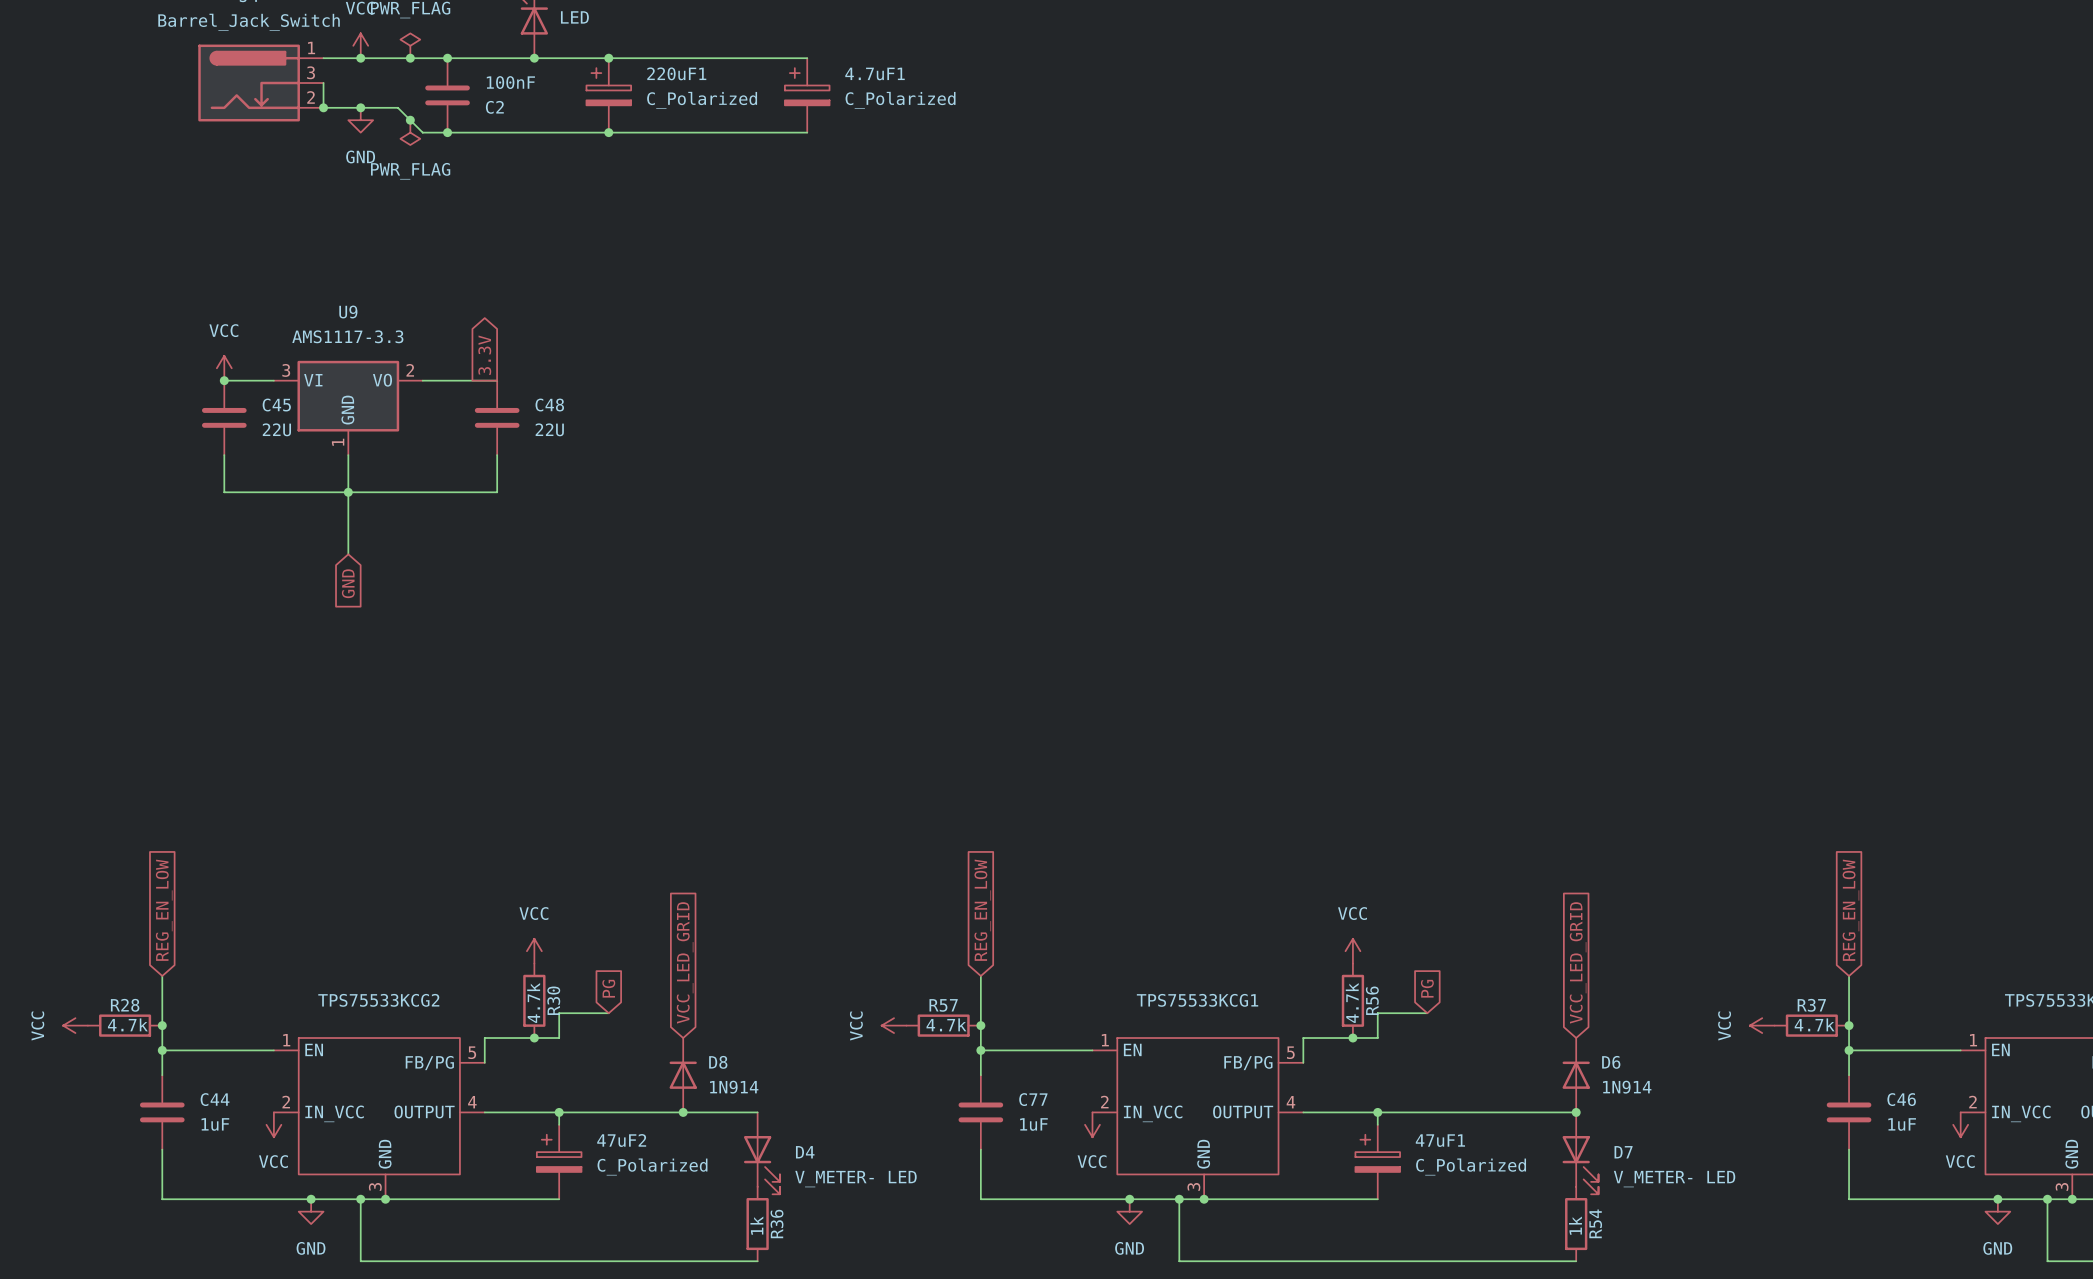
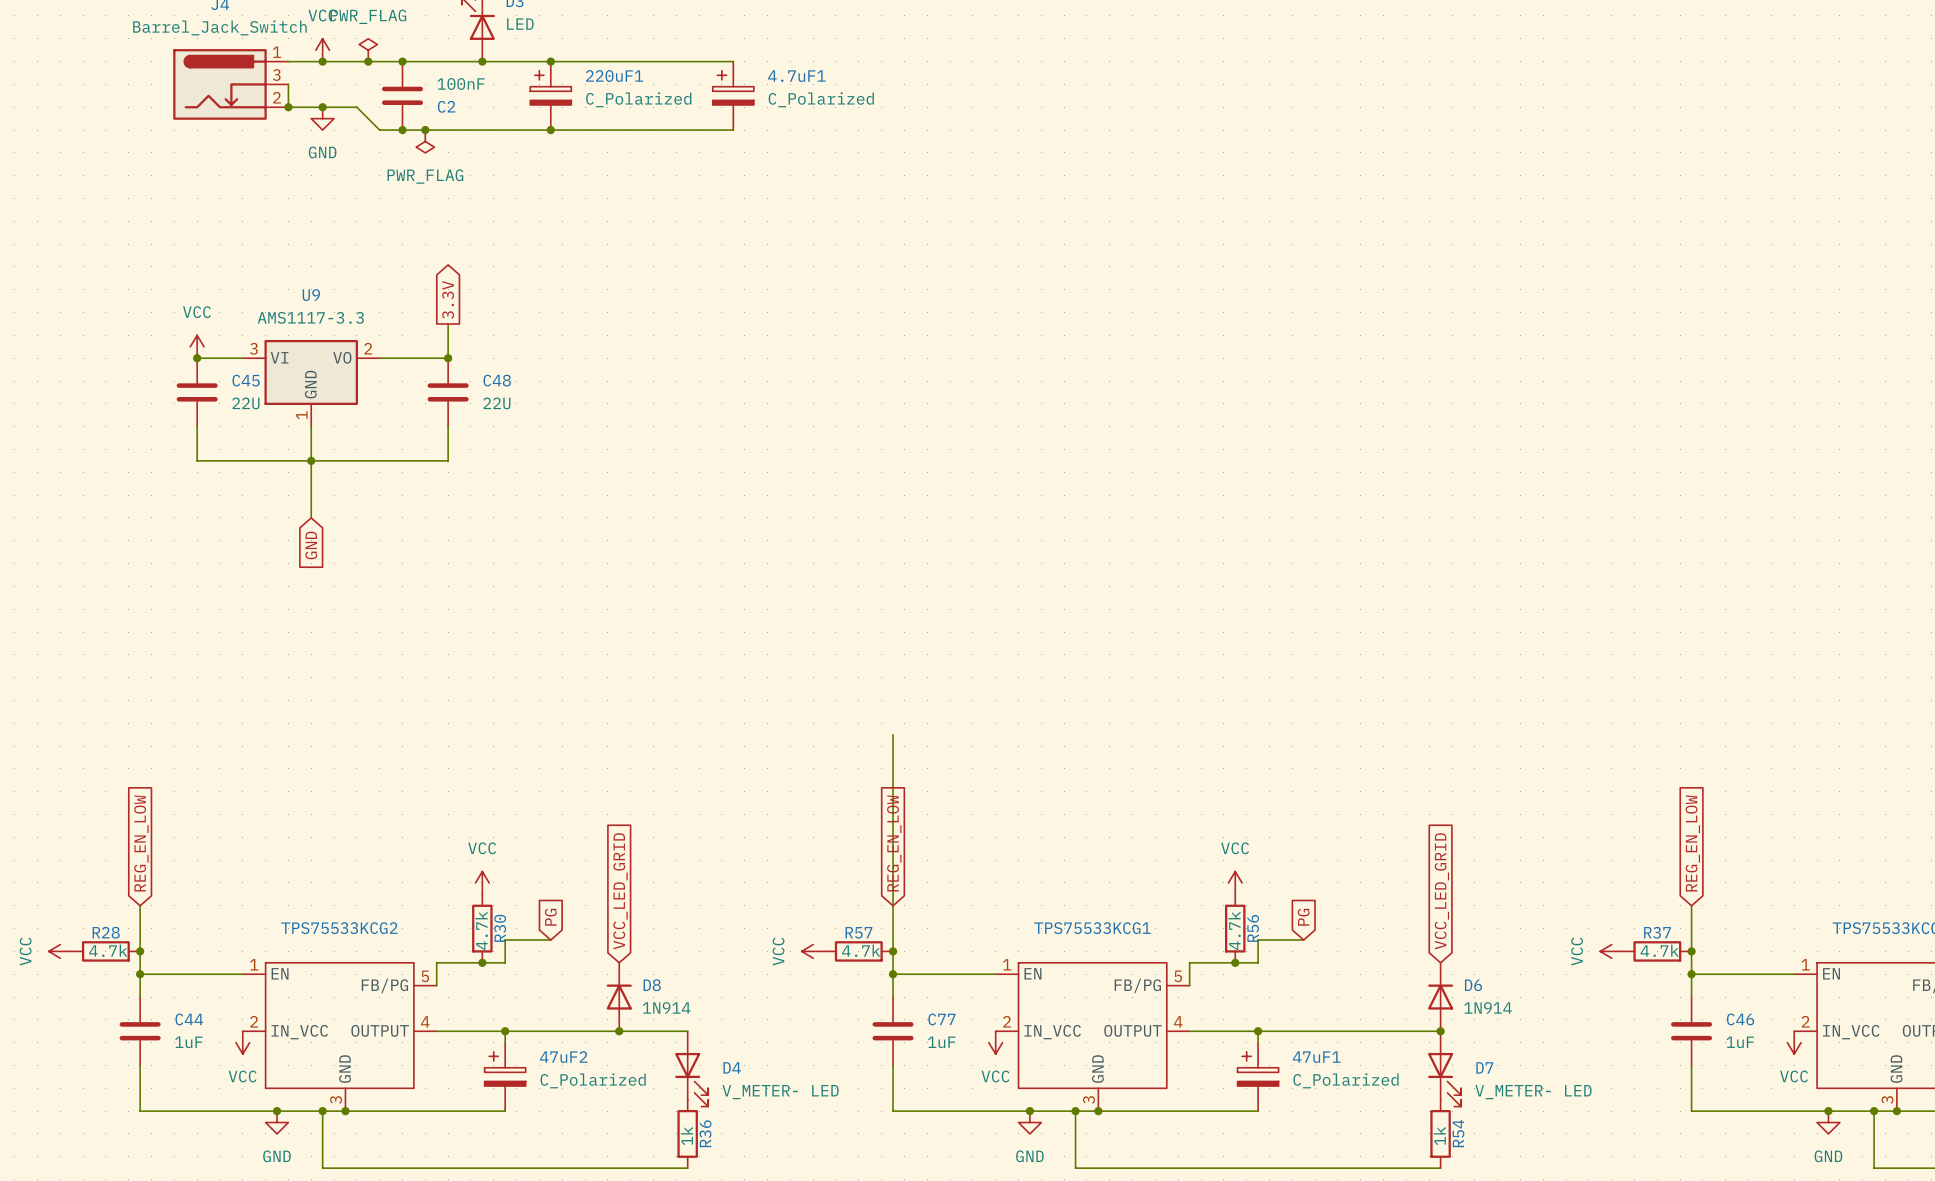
junction: (410, 120) -> none
power symbol position: PWR_FLAG (410, 132) -> PWR_FLAG (425, 141)
junction: none -> (425, 130)
global label position: 3.3V (484, 355) -> 3.3V (448, 300)
junction: none -> (448, 358)
wire: none -> (893, 734) (893, 905)

